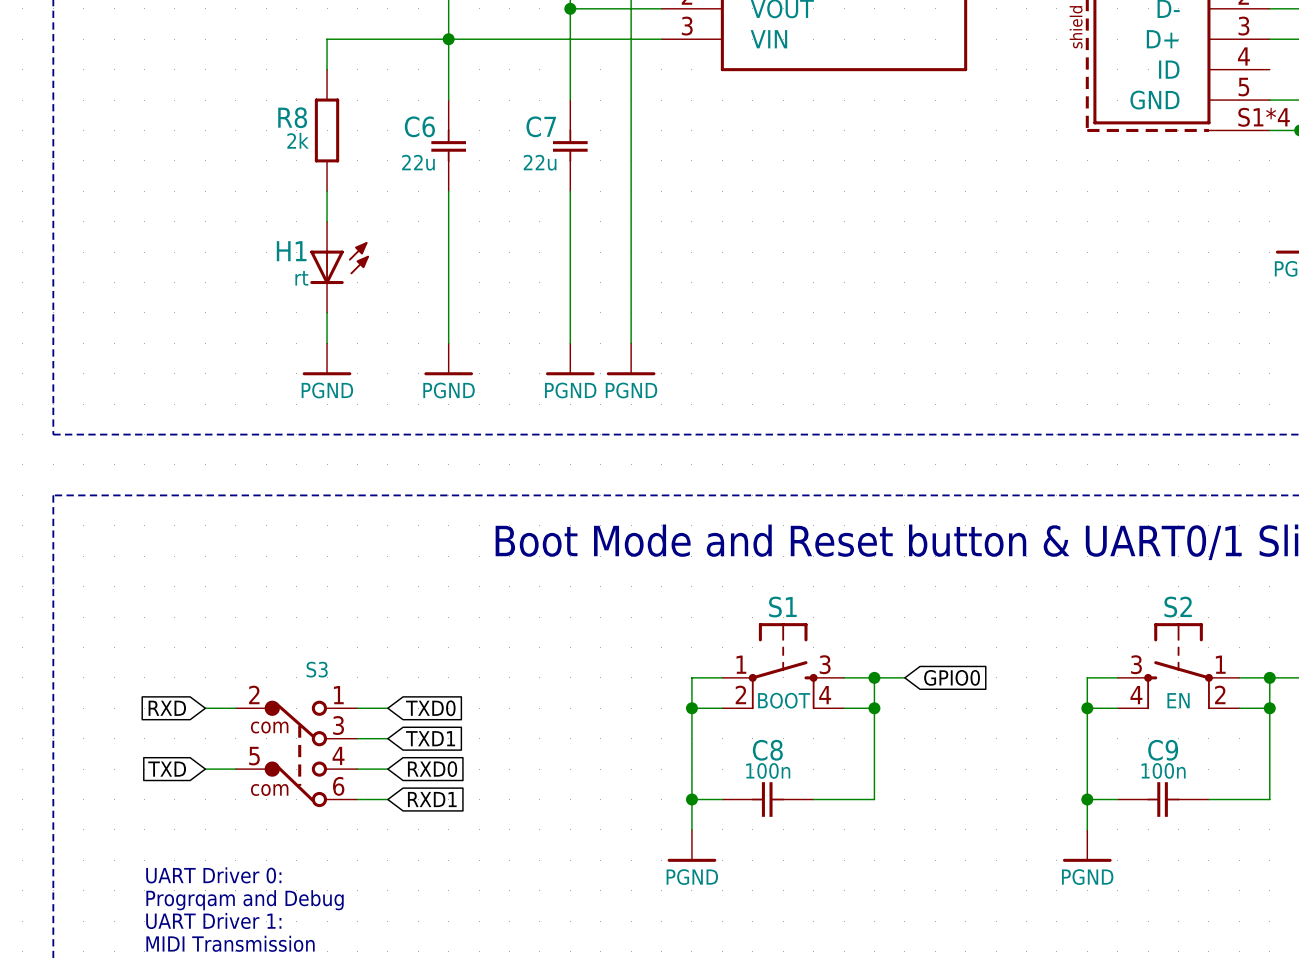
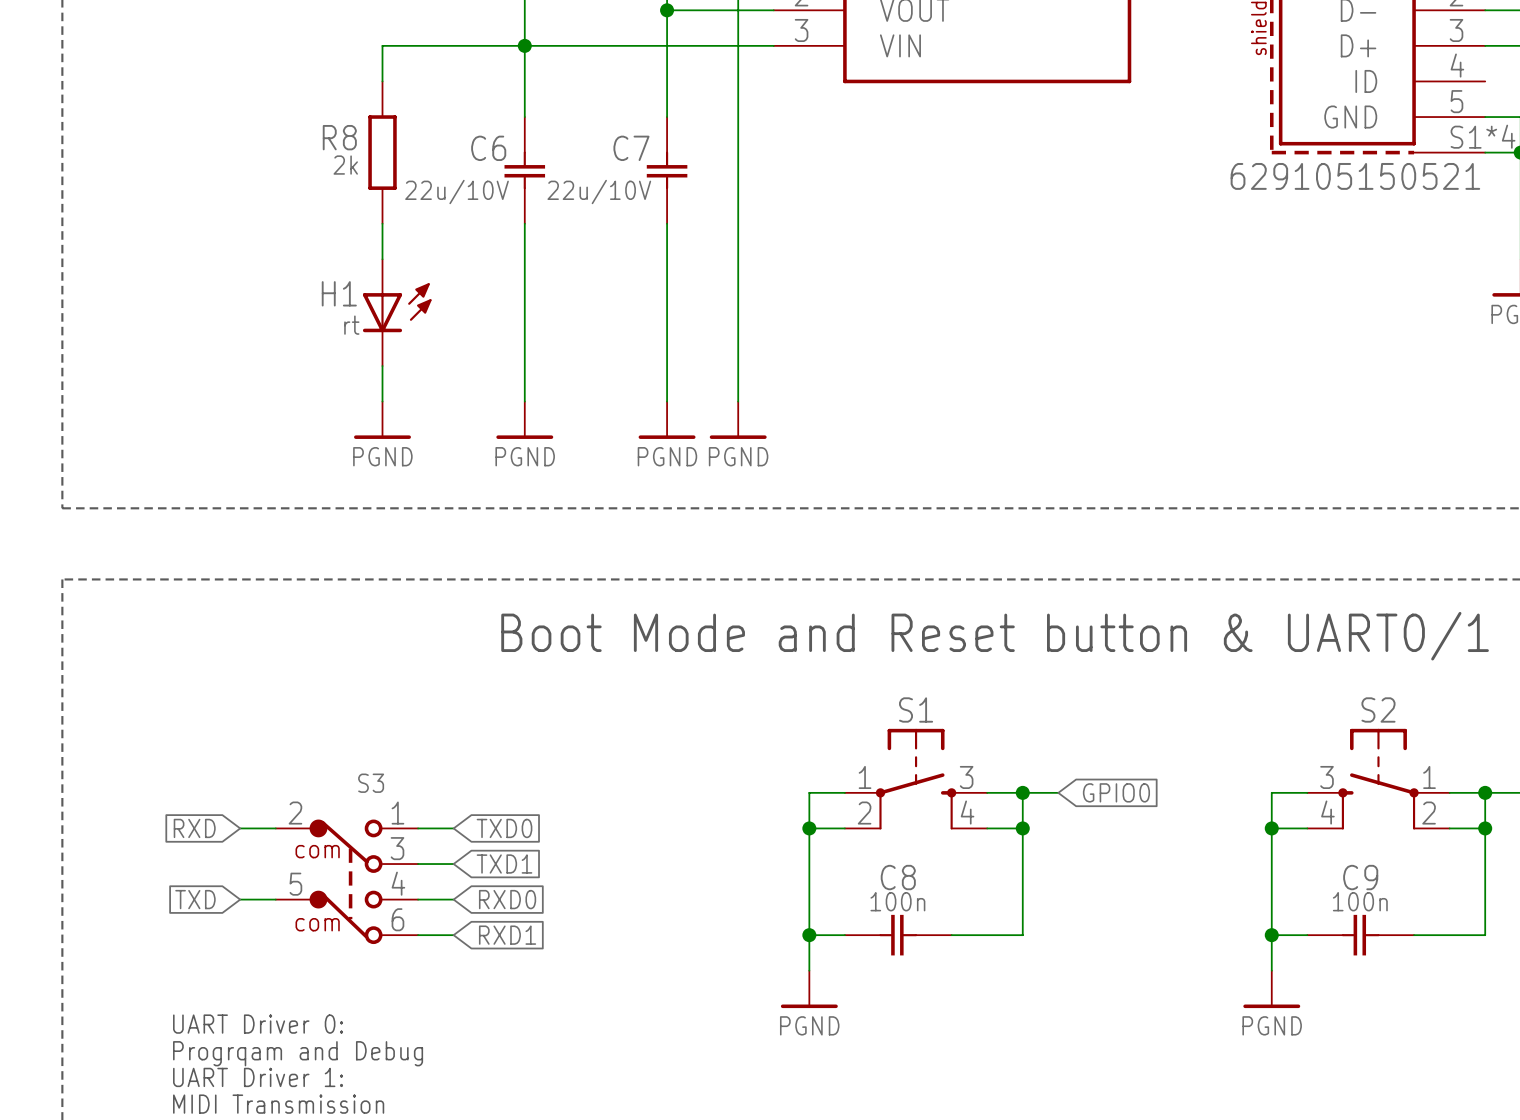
part value: none -> 629105150521 (1355, 176)
C6 value: 22u (418, 162) -> 22u/10V (457, 191)
C7 value: 22u (540, 162) -> 22u/10V (599, 191)
S1 value: BOOT (784, 700) -> none
S2 value: EN (1178, 700) -> none

